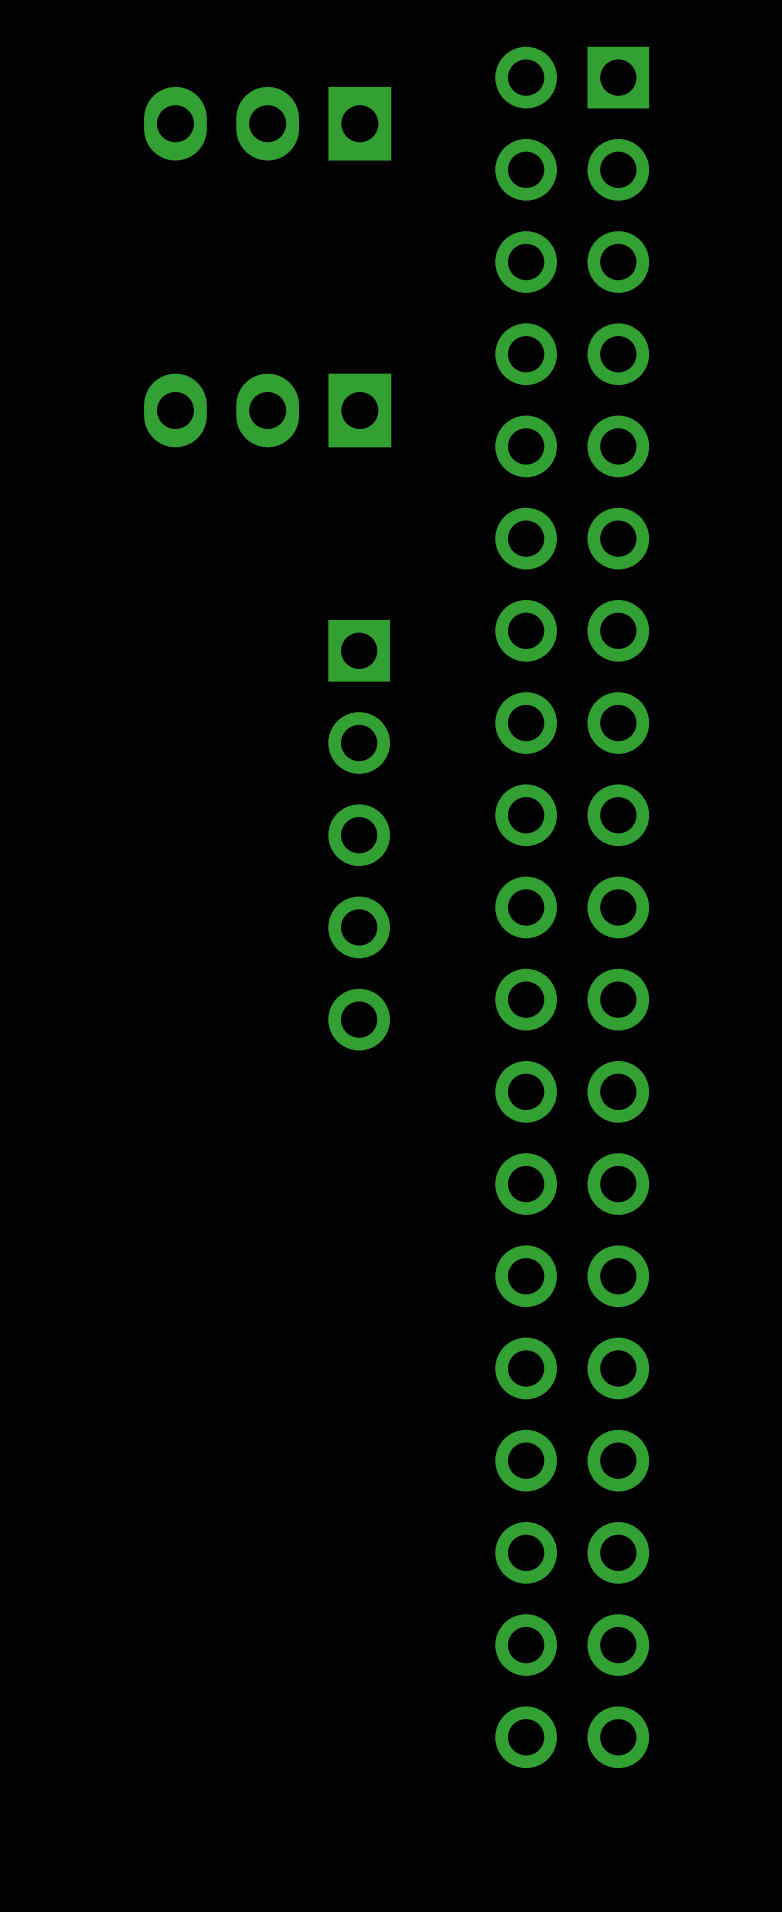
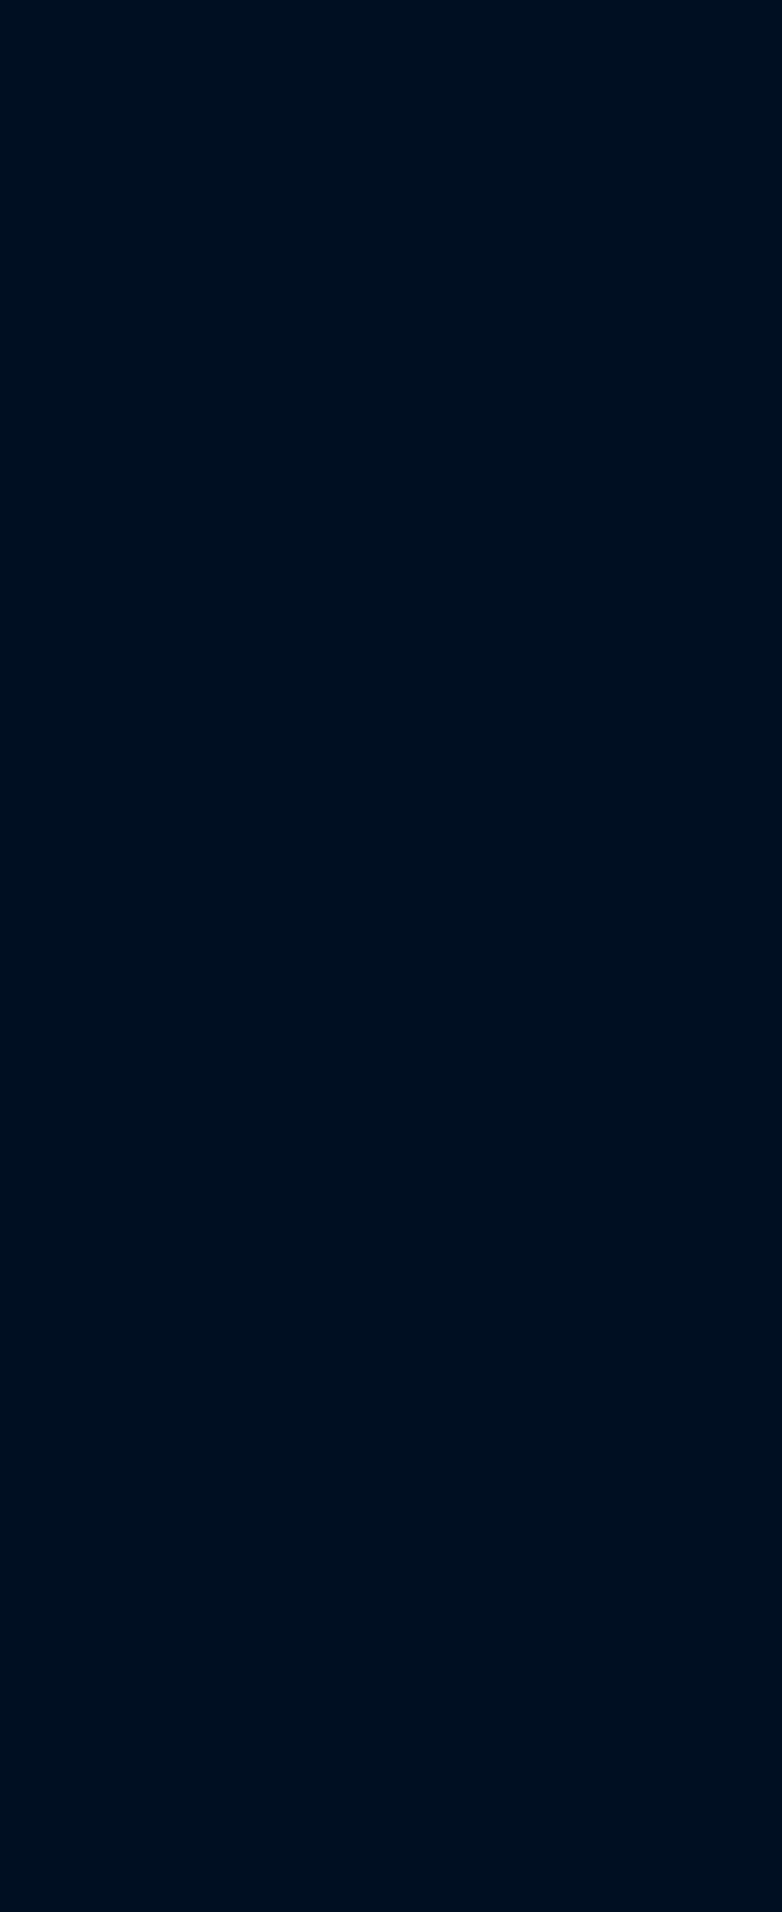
part: (267, 123) -> none
part: (267, 410) -> none
part: (359, 835) -> none
part: (572, 907) -> none

